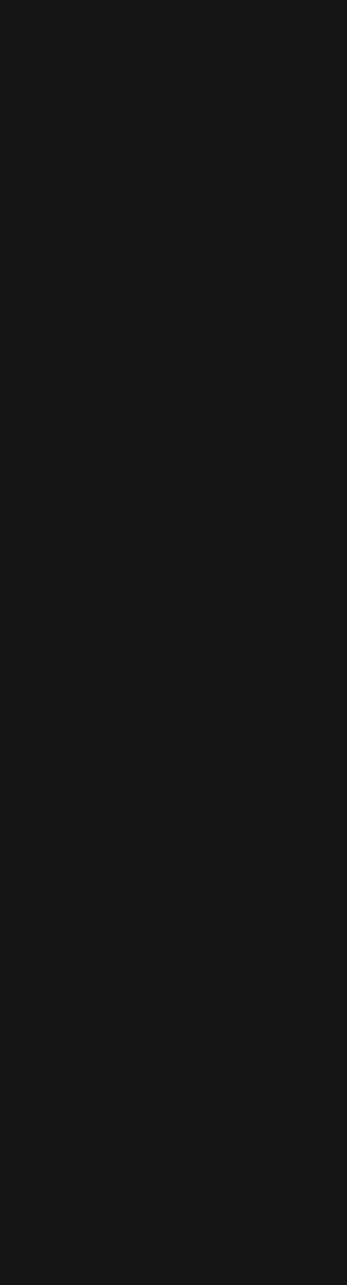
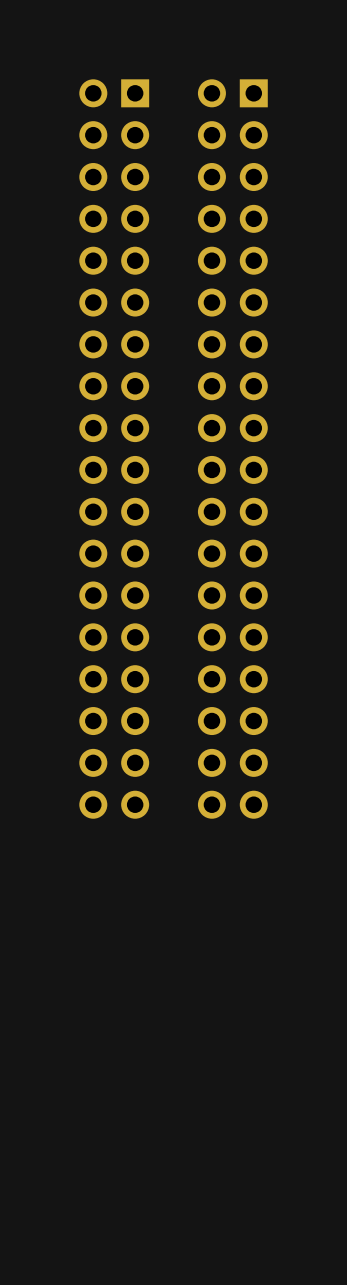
part: none -> (114, 449)
part: none -> (232, 449)

